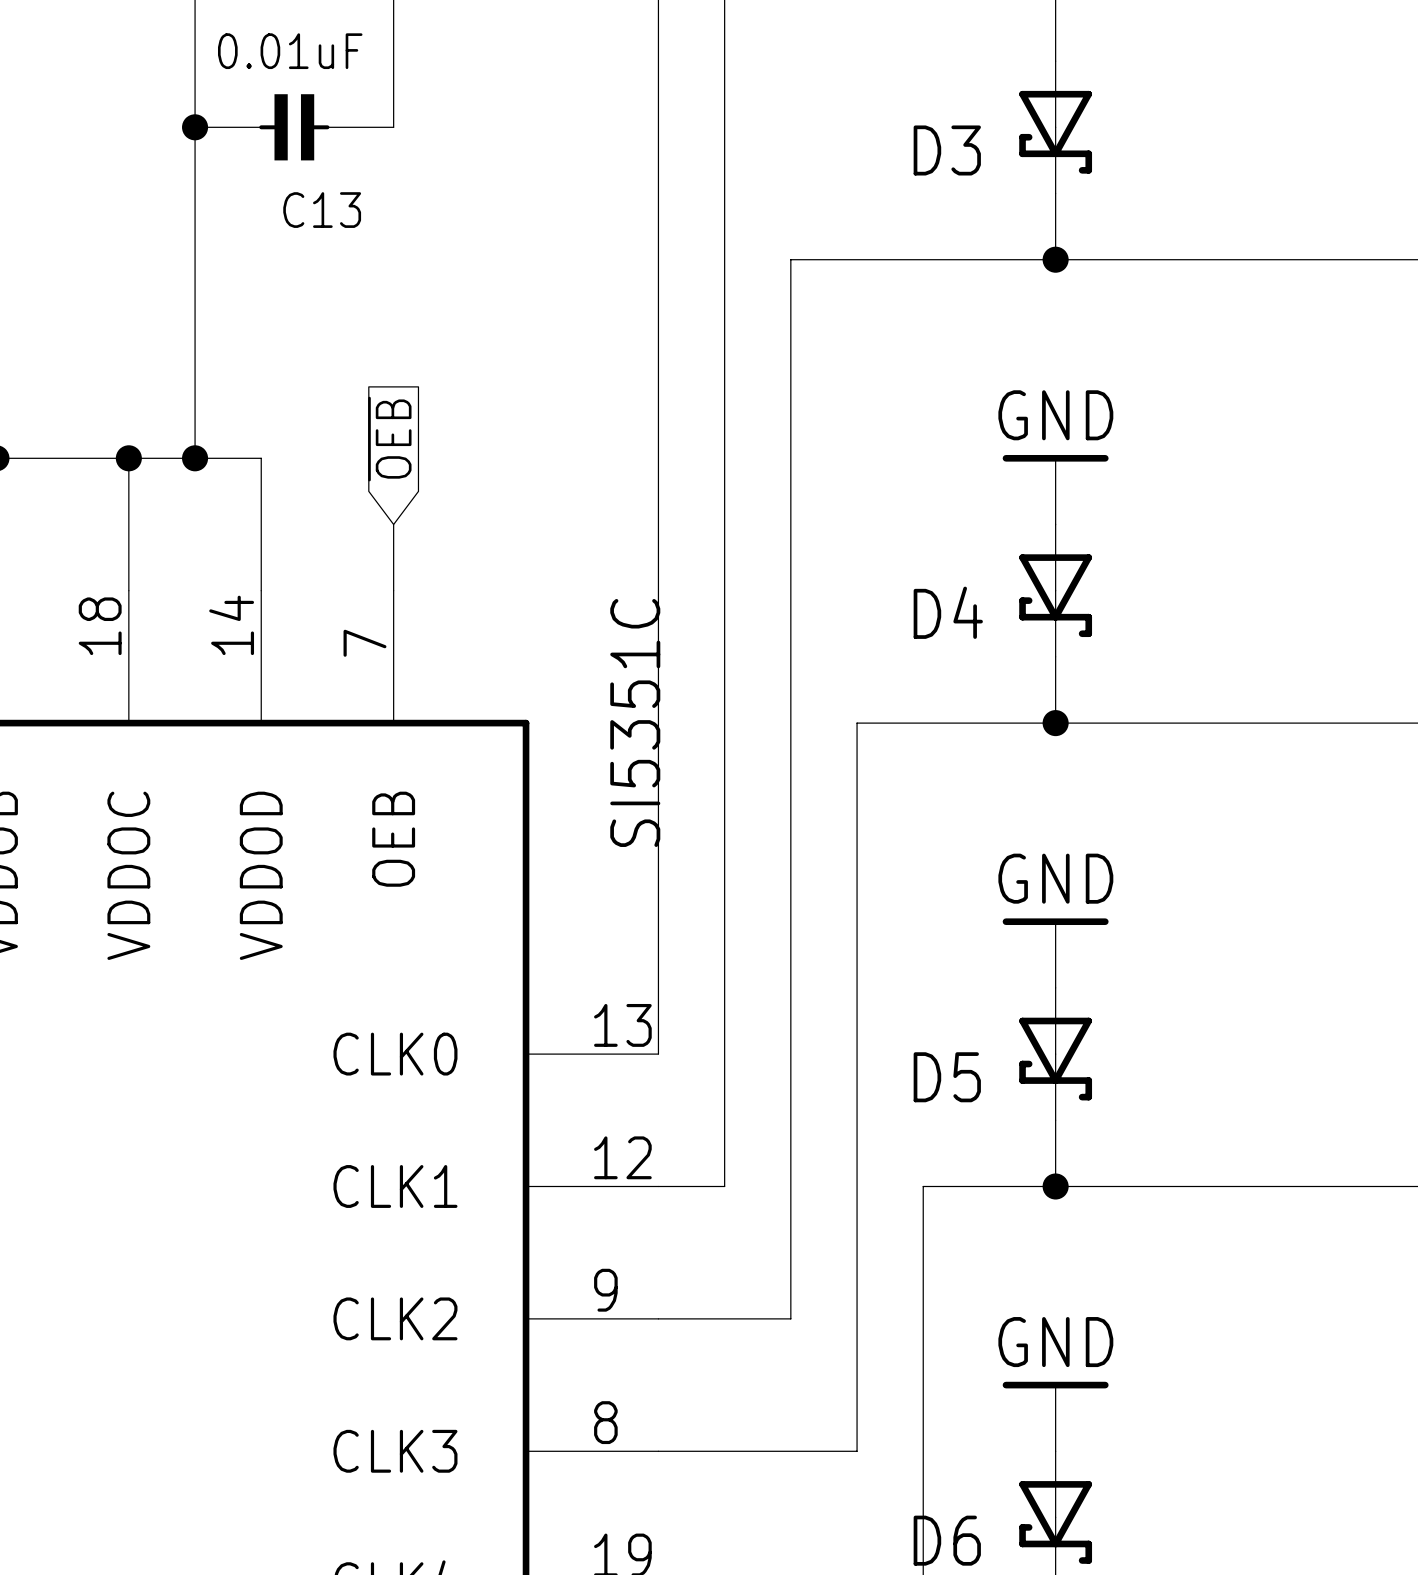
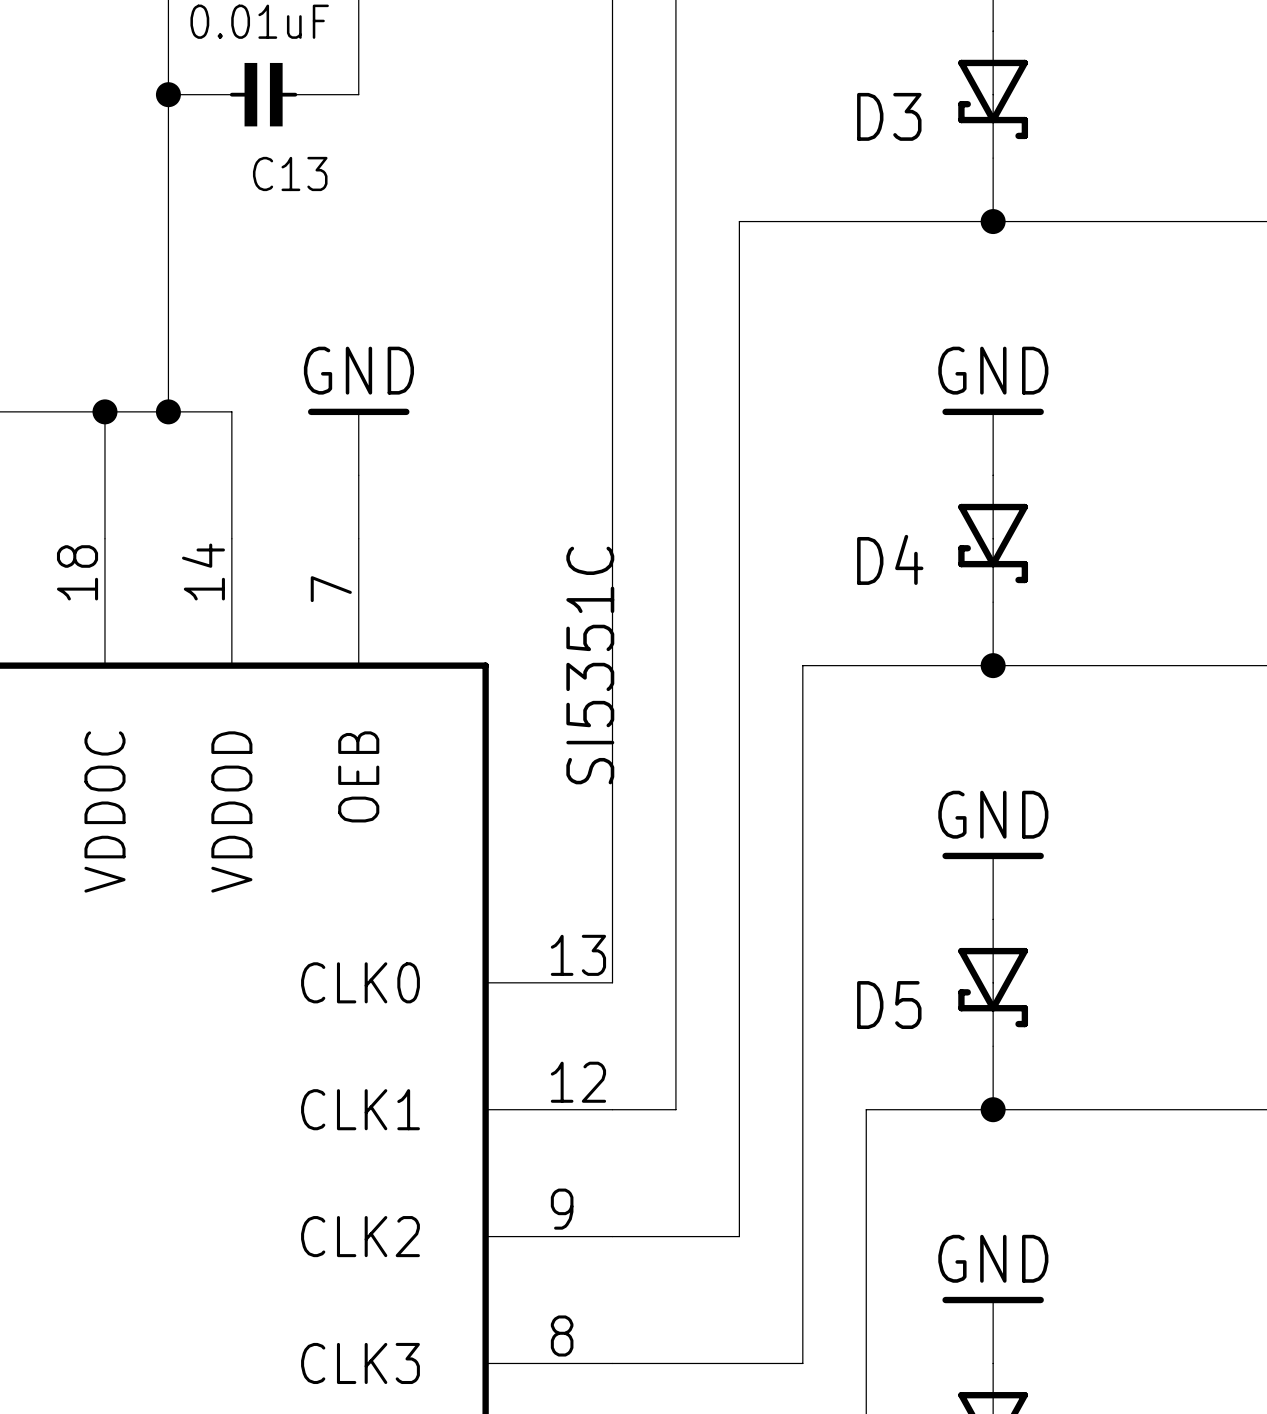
global label: ~{OEB} (389, 439) -> none
power symbol: none -> GND (358, 442)

